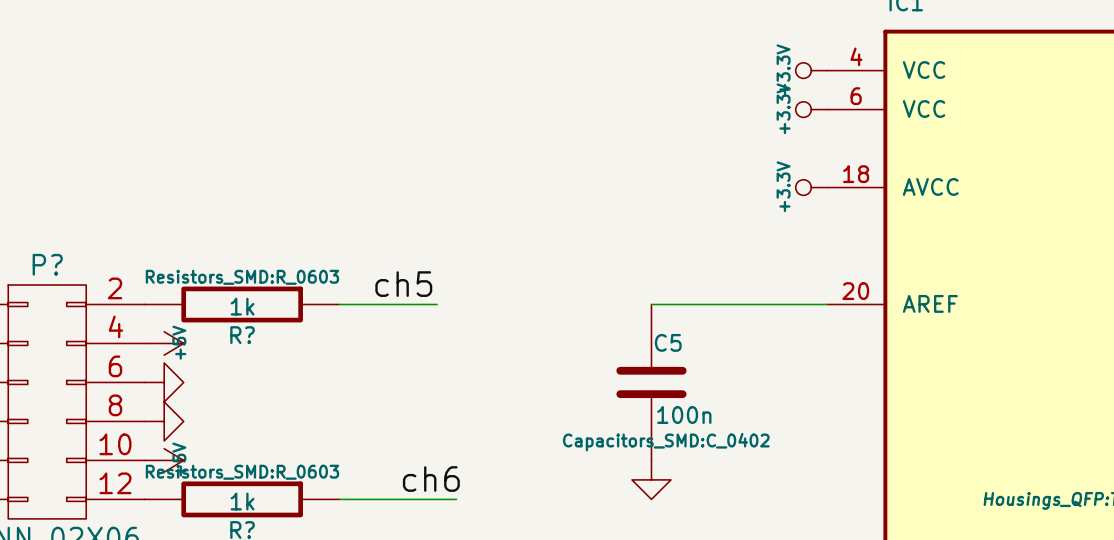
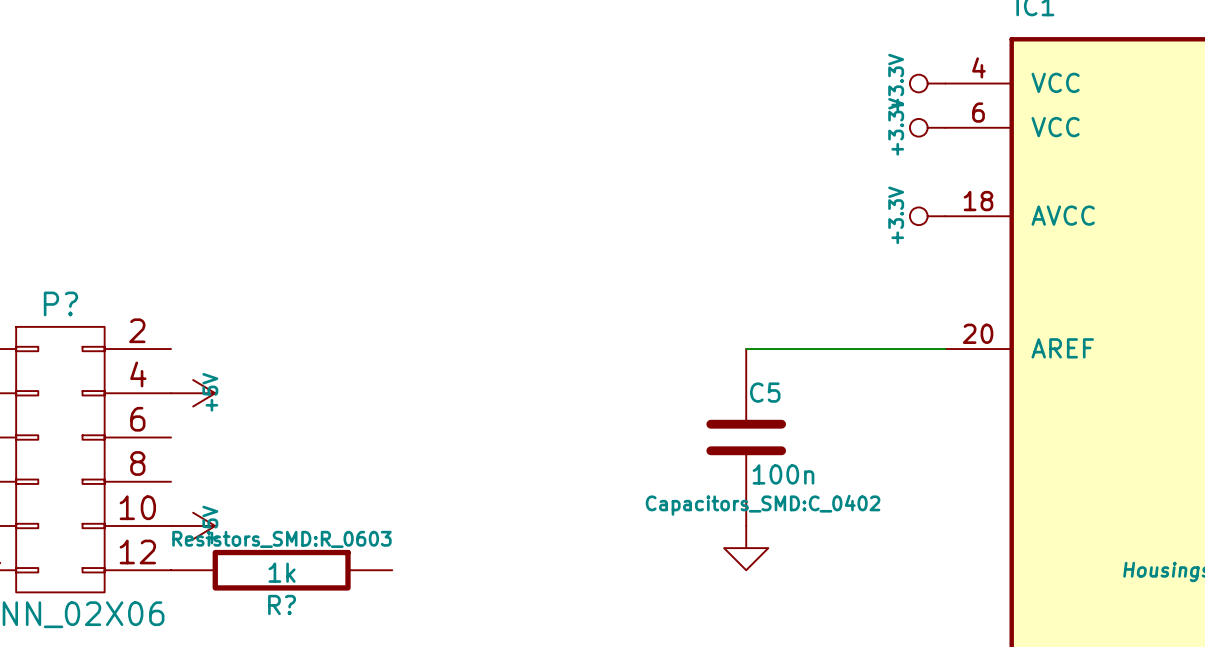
label: ch5 (403, 284) -> none
R?: 1k (242, 304) -> none
wire: (339, 304) (437, 304) -> none
power symbol: (164, 382) -> none
power symbol: (164, 421) -> none
label: ch6 (431, 479) -> none
wire: (339, 499) (456, 499) -> none

